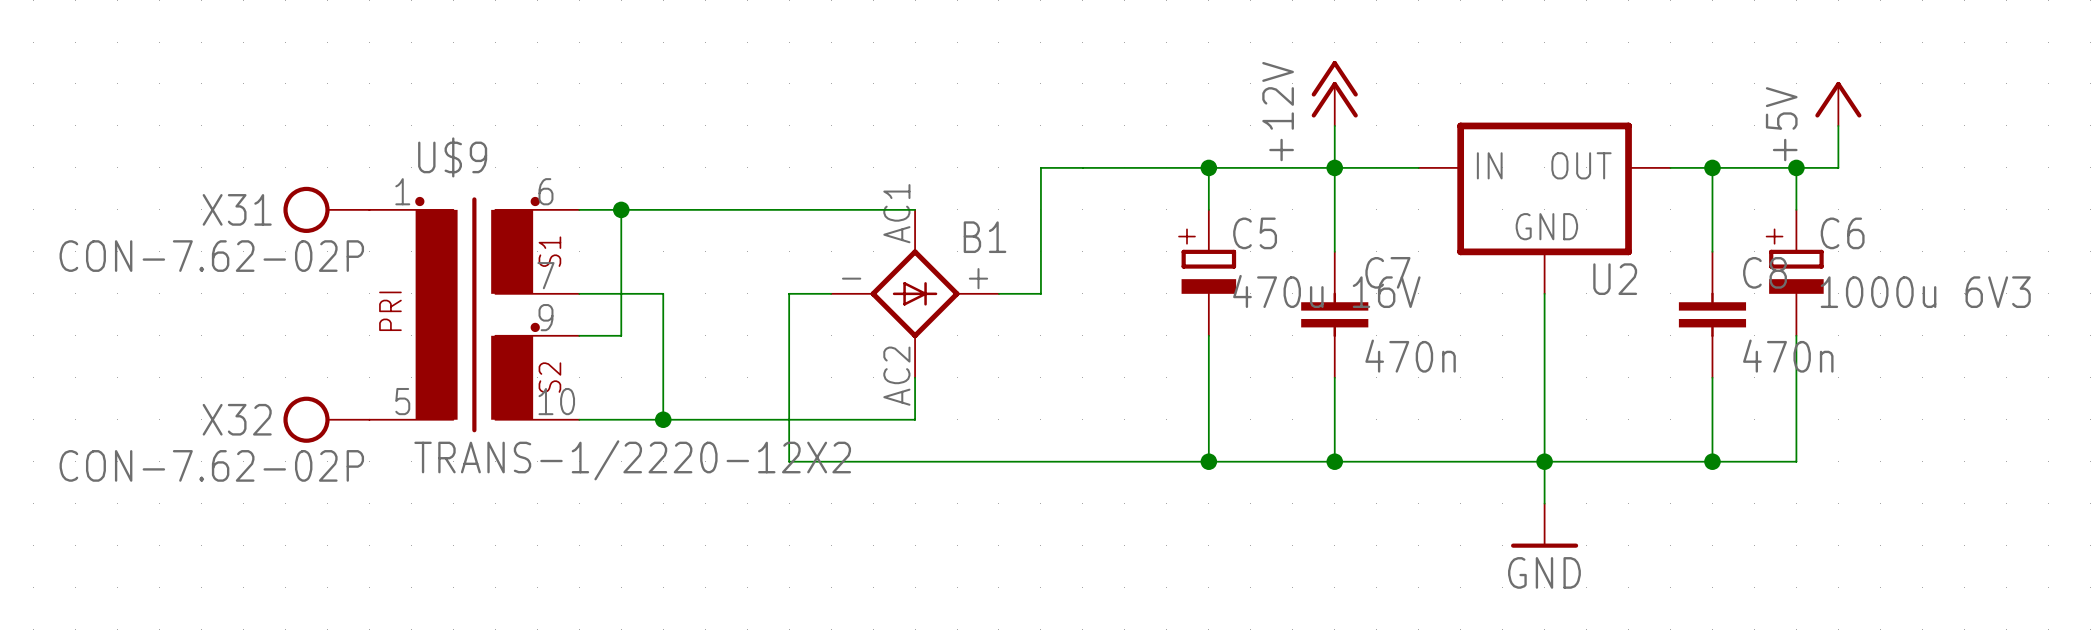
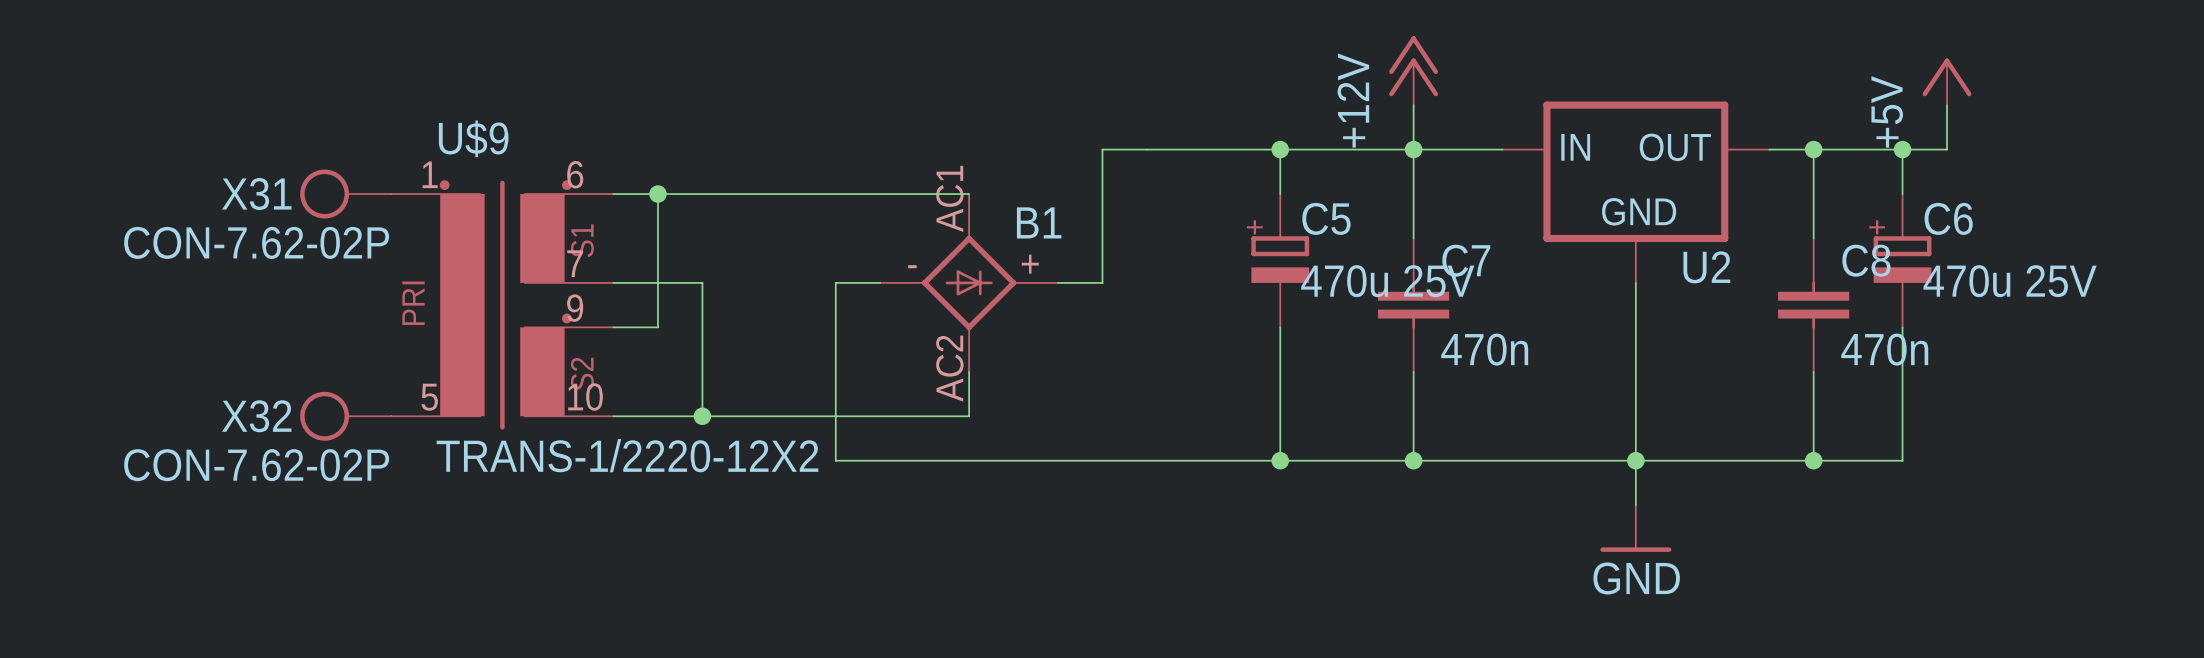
C5 value: 470u 16V (1326, 291) -> 470u 25V (1387, 281)
C6 value: 1000u 6V3 (1925, 292) -> 470u 25V (2010, 281)

